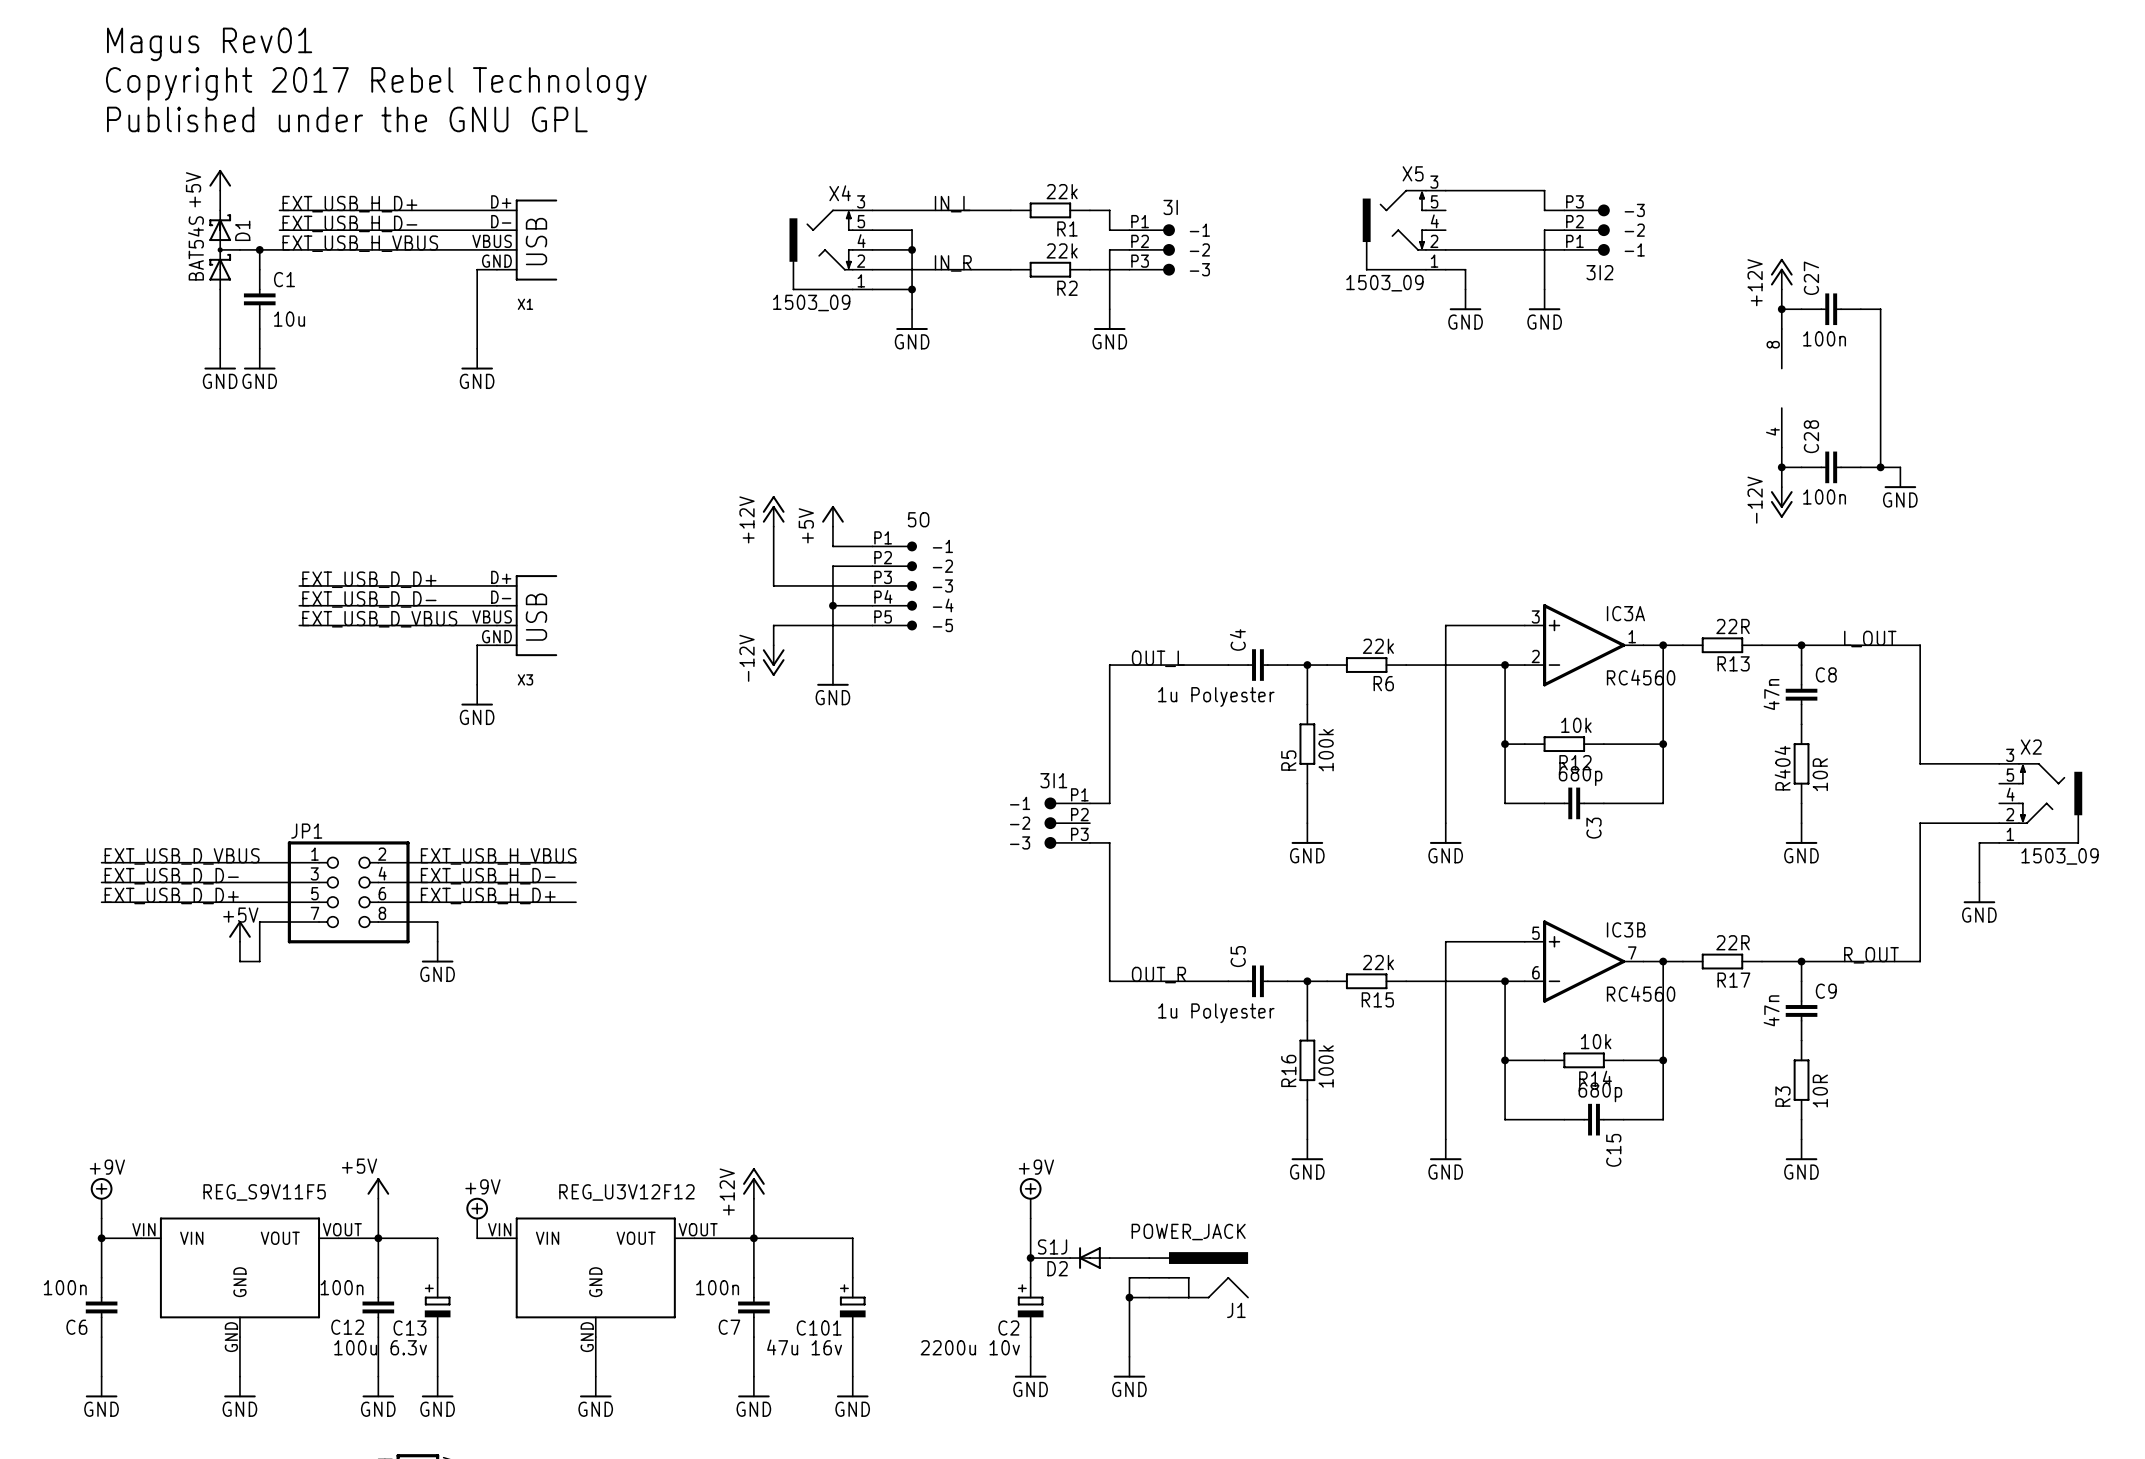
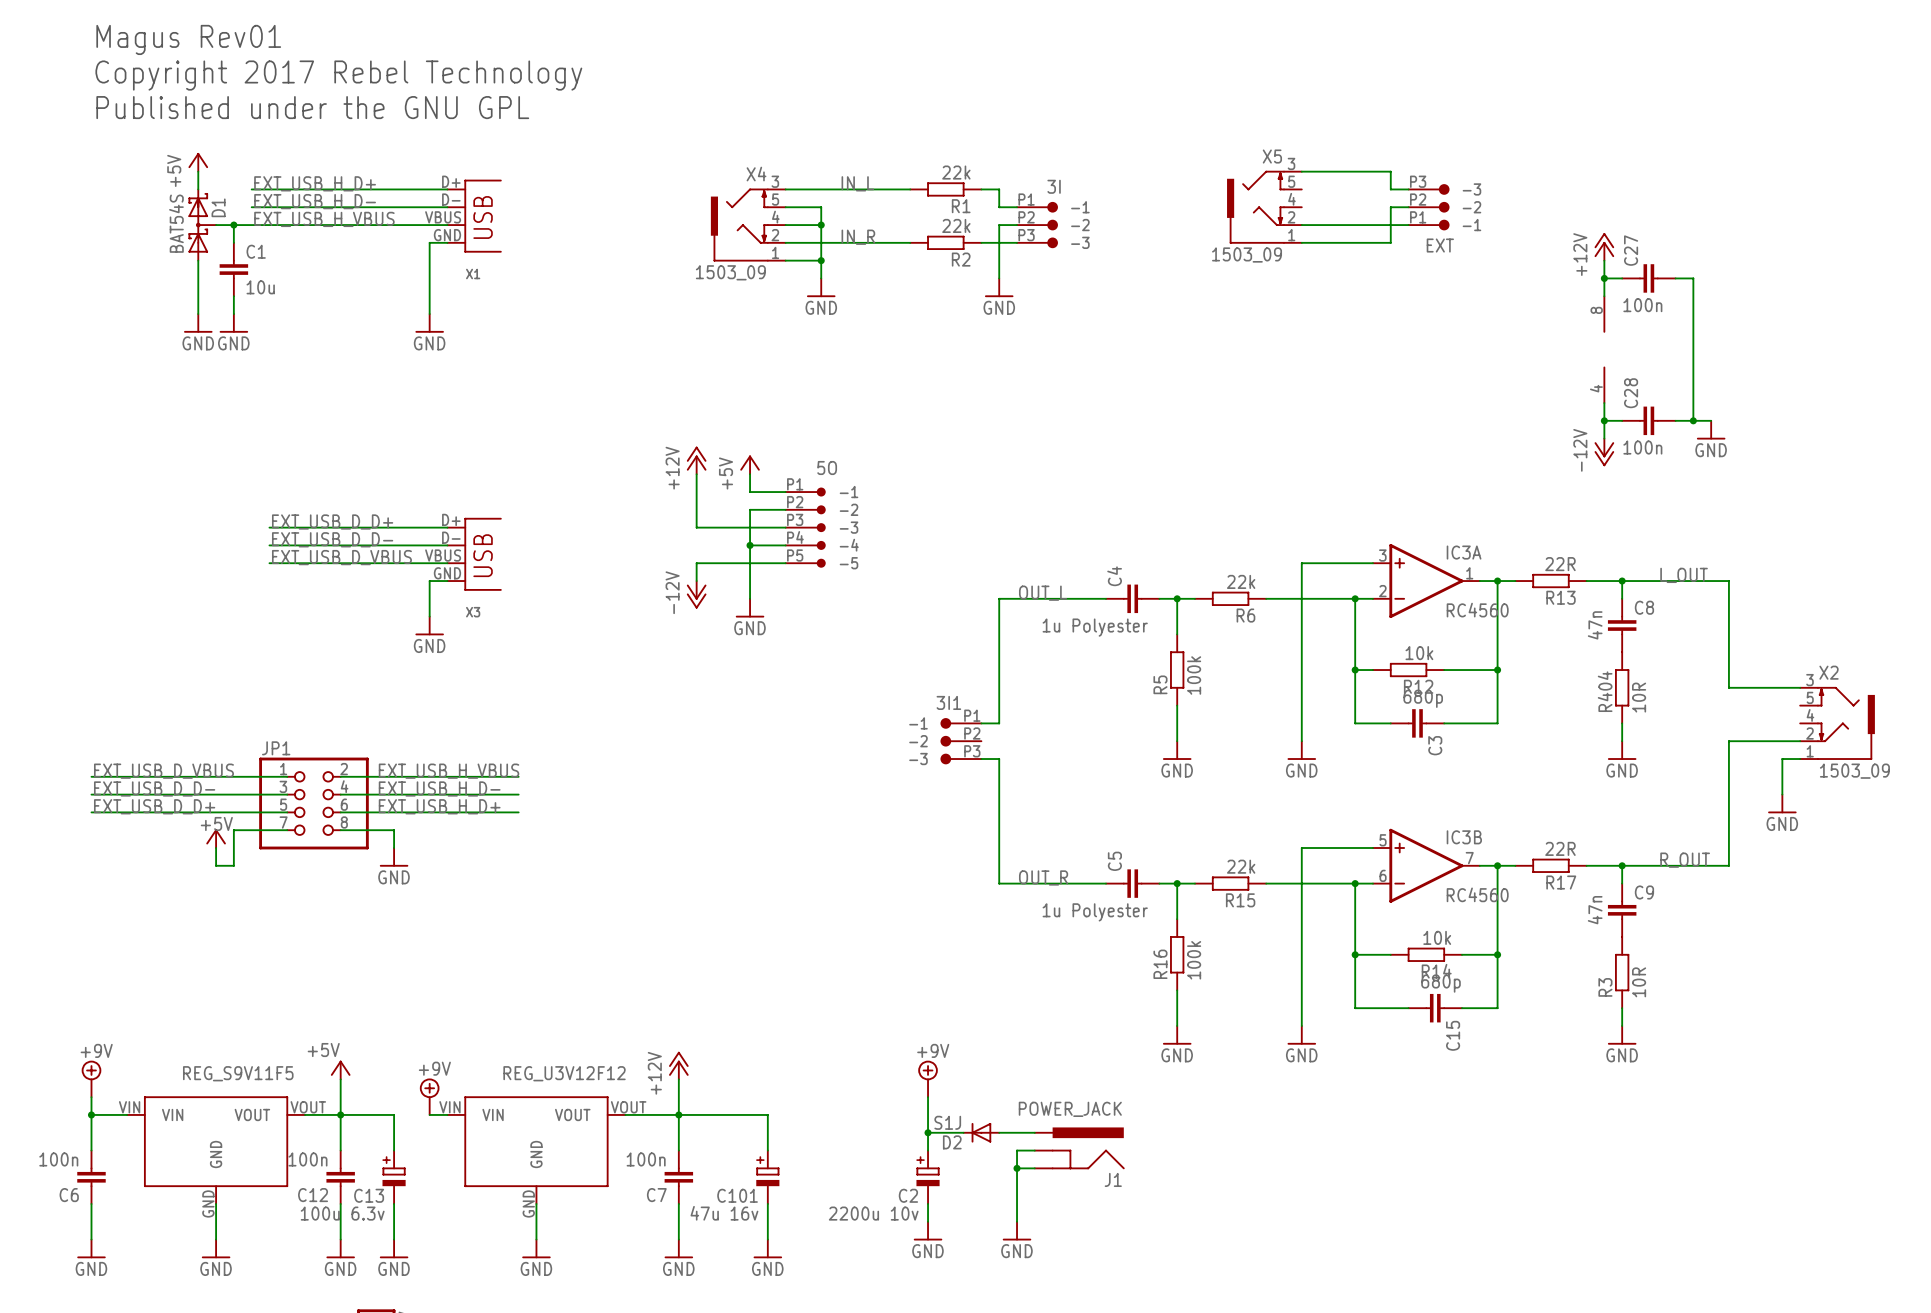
wire: (1465, 269) (1465, 289) -> (1319, 242) (1390, 242)
wire: (1544, 269) (1544, 289) -> none
3I2 name: 3I2 (1599, 272) -> EXT (1440, 245)
power symbol: GND (1465, 299) -> none
power symbol: GND (1544, 299) -> none

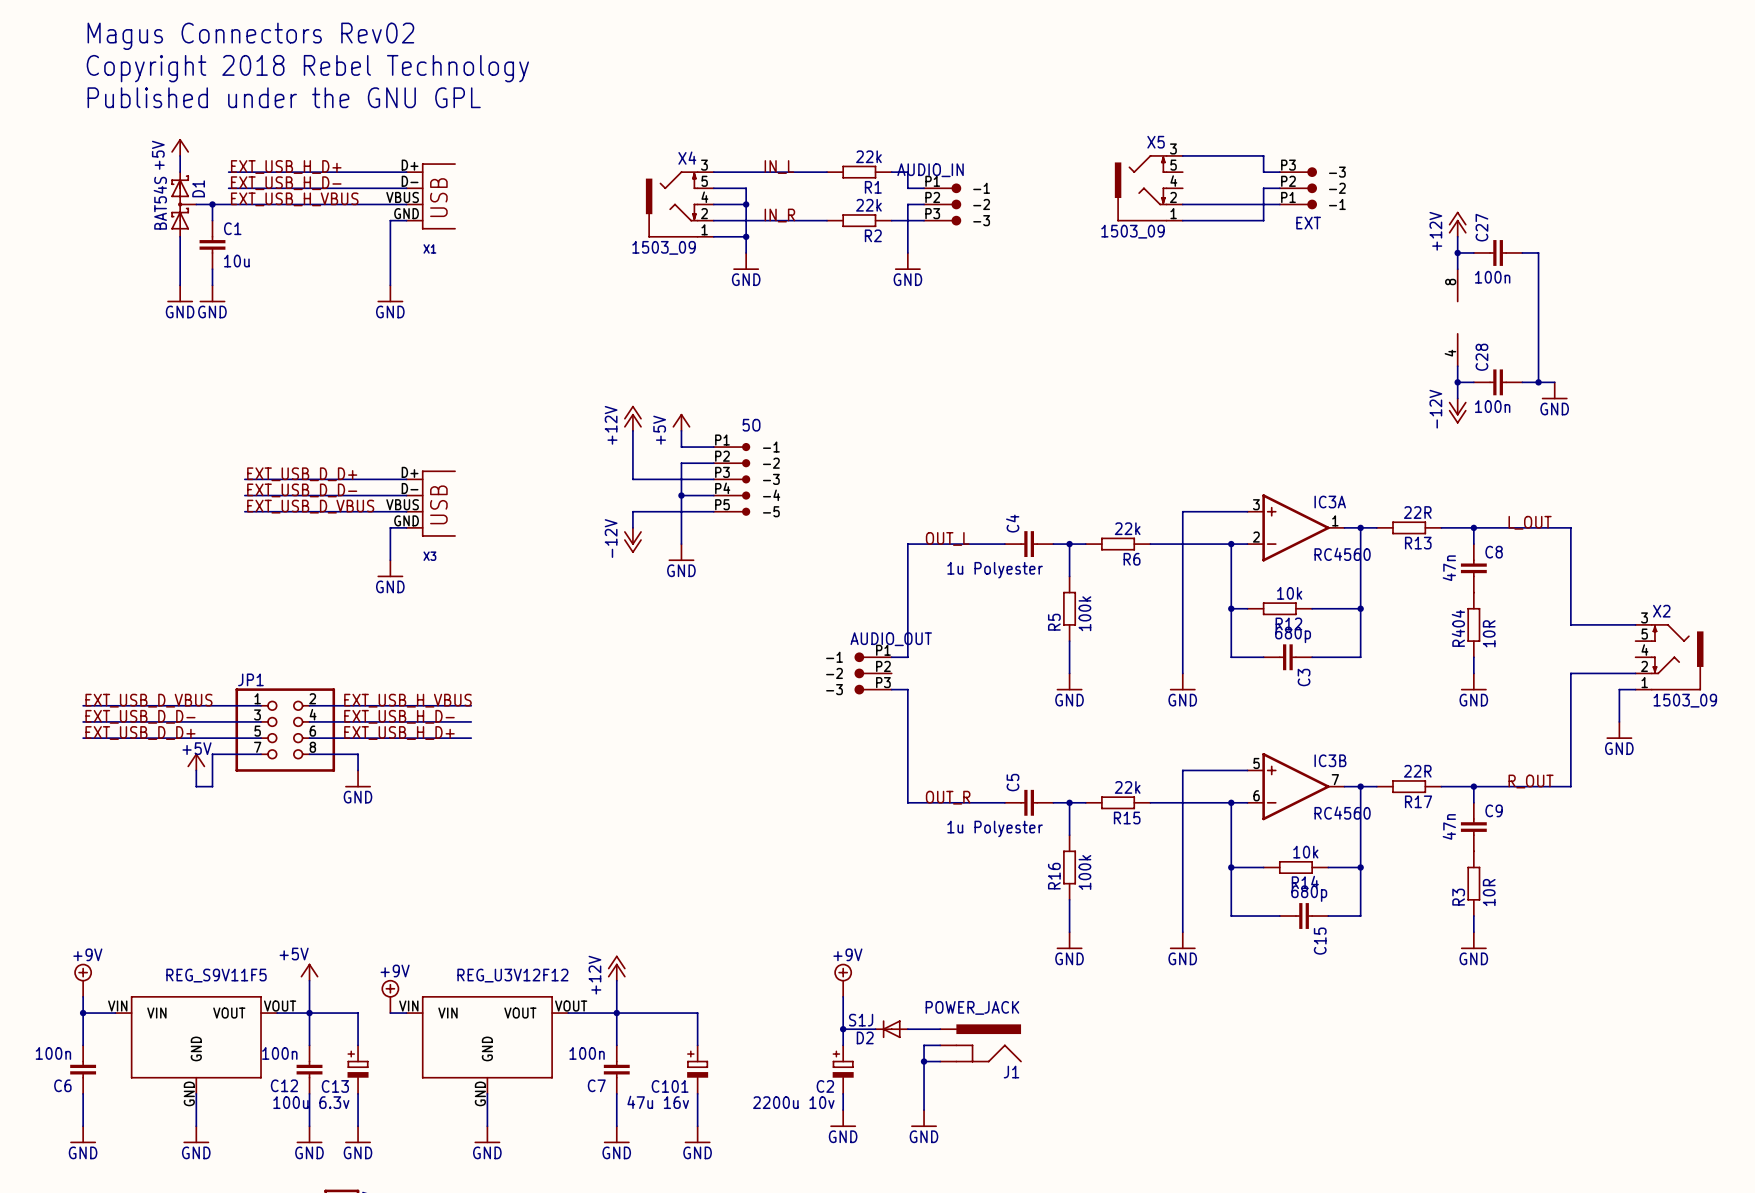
text: Magus Rev01 (188, 39) -> Magus Connectors Rev02 (250, 36)
text: Copyright 2017 Rebel Technology (338, 75) -> Copyright 2018 Rebel Technology (307, 68)
3I name: 3I (1054, 186) -> AUDIO_IN (930, 170)
3I1 name: 3I1 (948, 702) -> AUDIO_OUT (891, 639)

